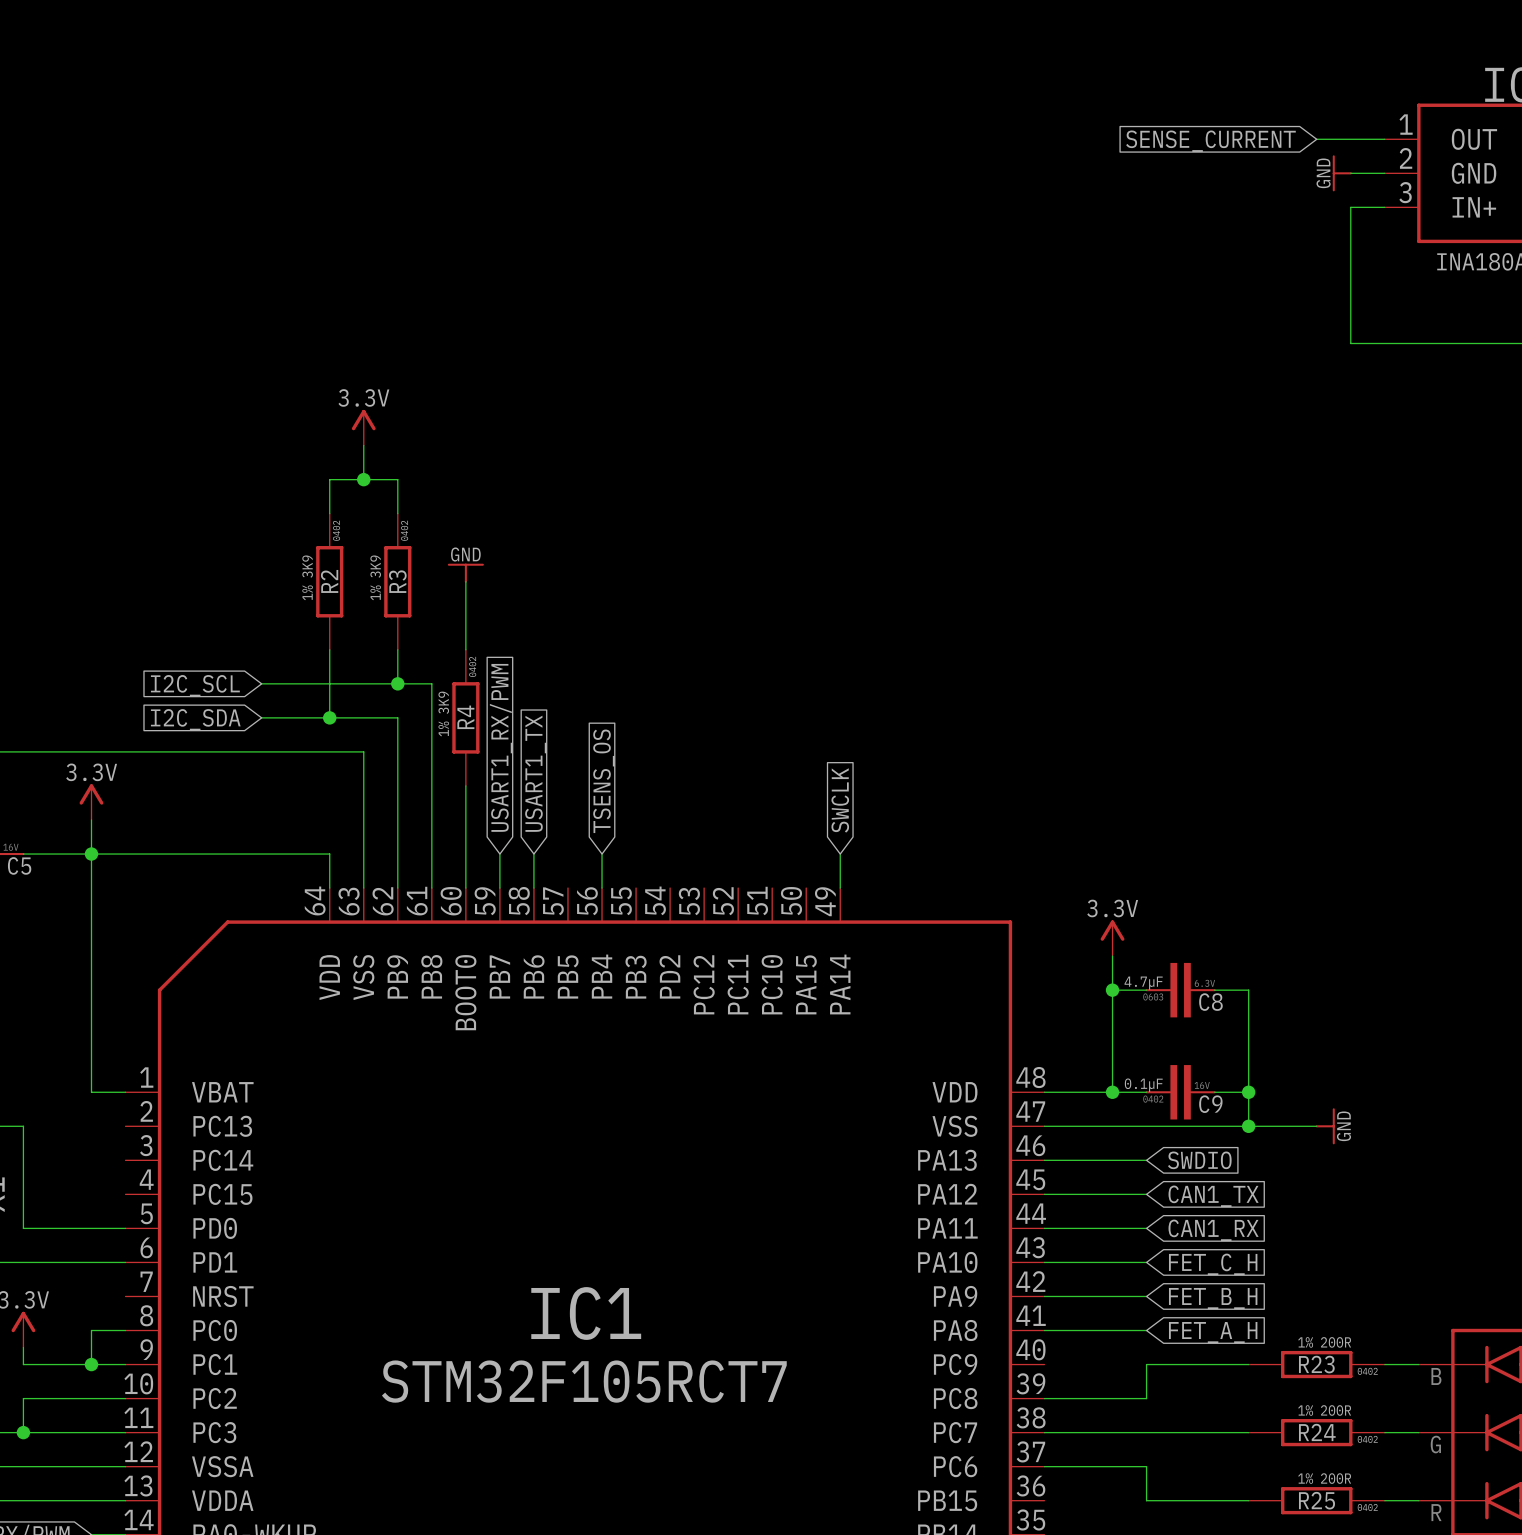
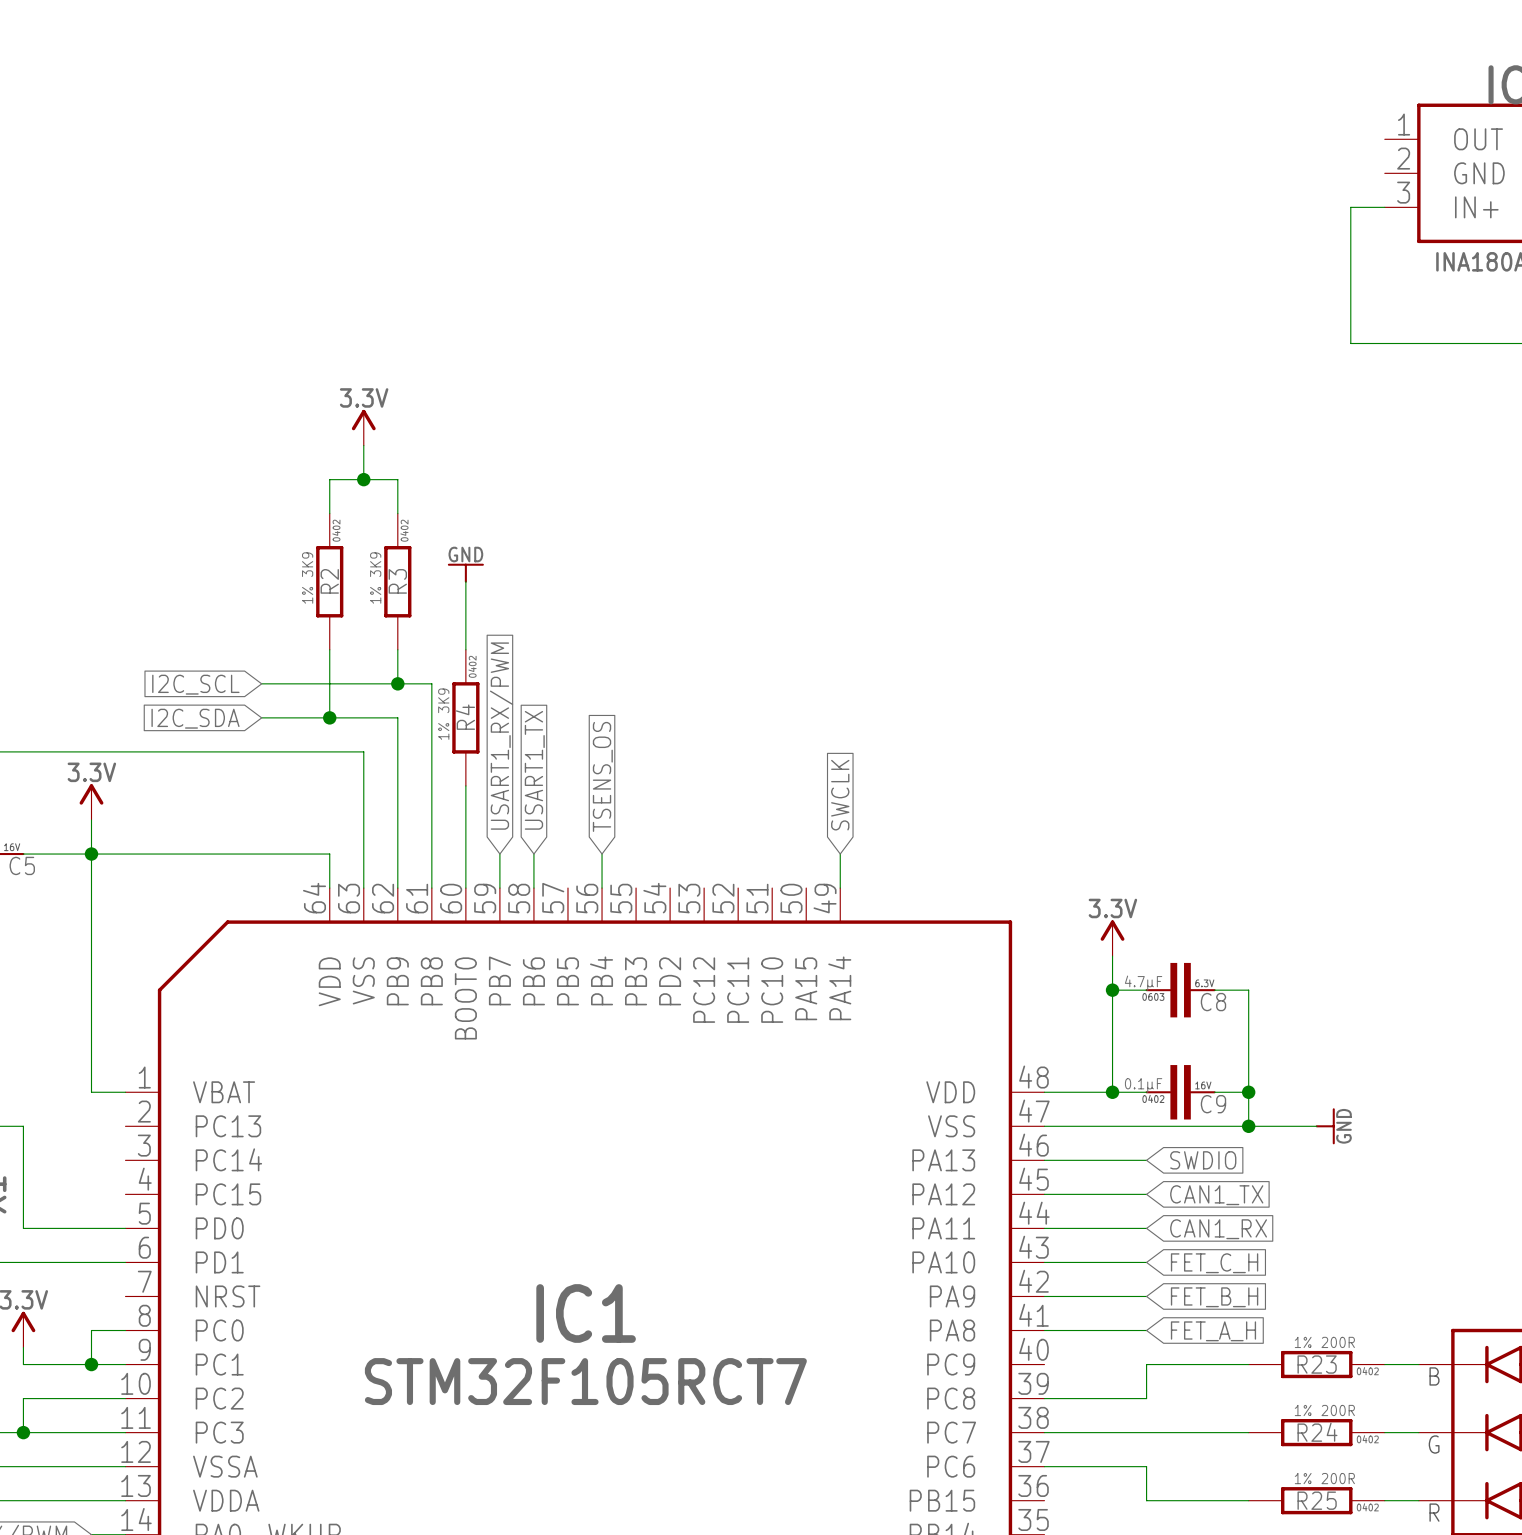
wire: (1316, 139) (1384, 139) -> none
global label: SENSE_CURRENT (1210, 141) -> none
power symbol: GND (1342, 173) -> none
wire: (1350, 173) (1384, 173) -> none

